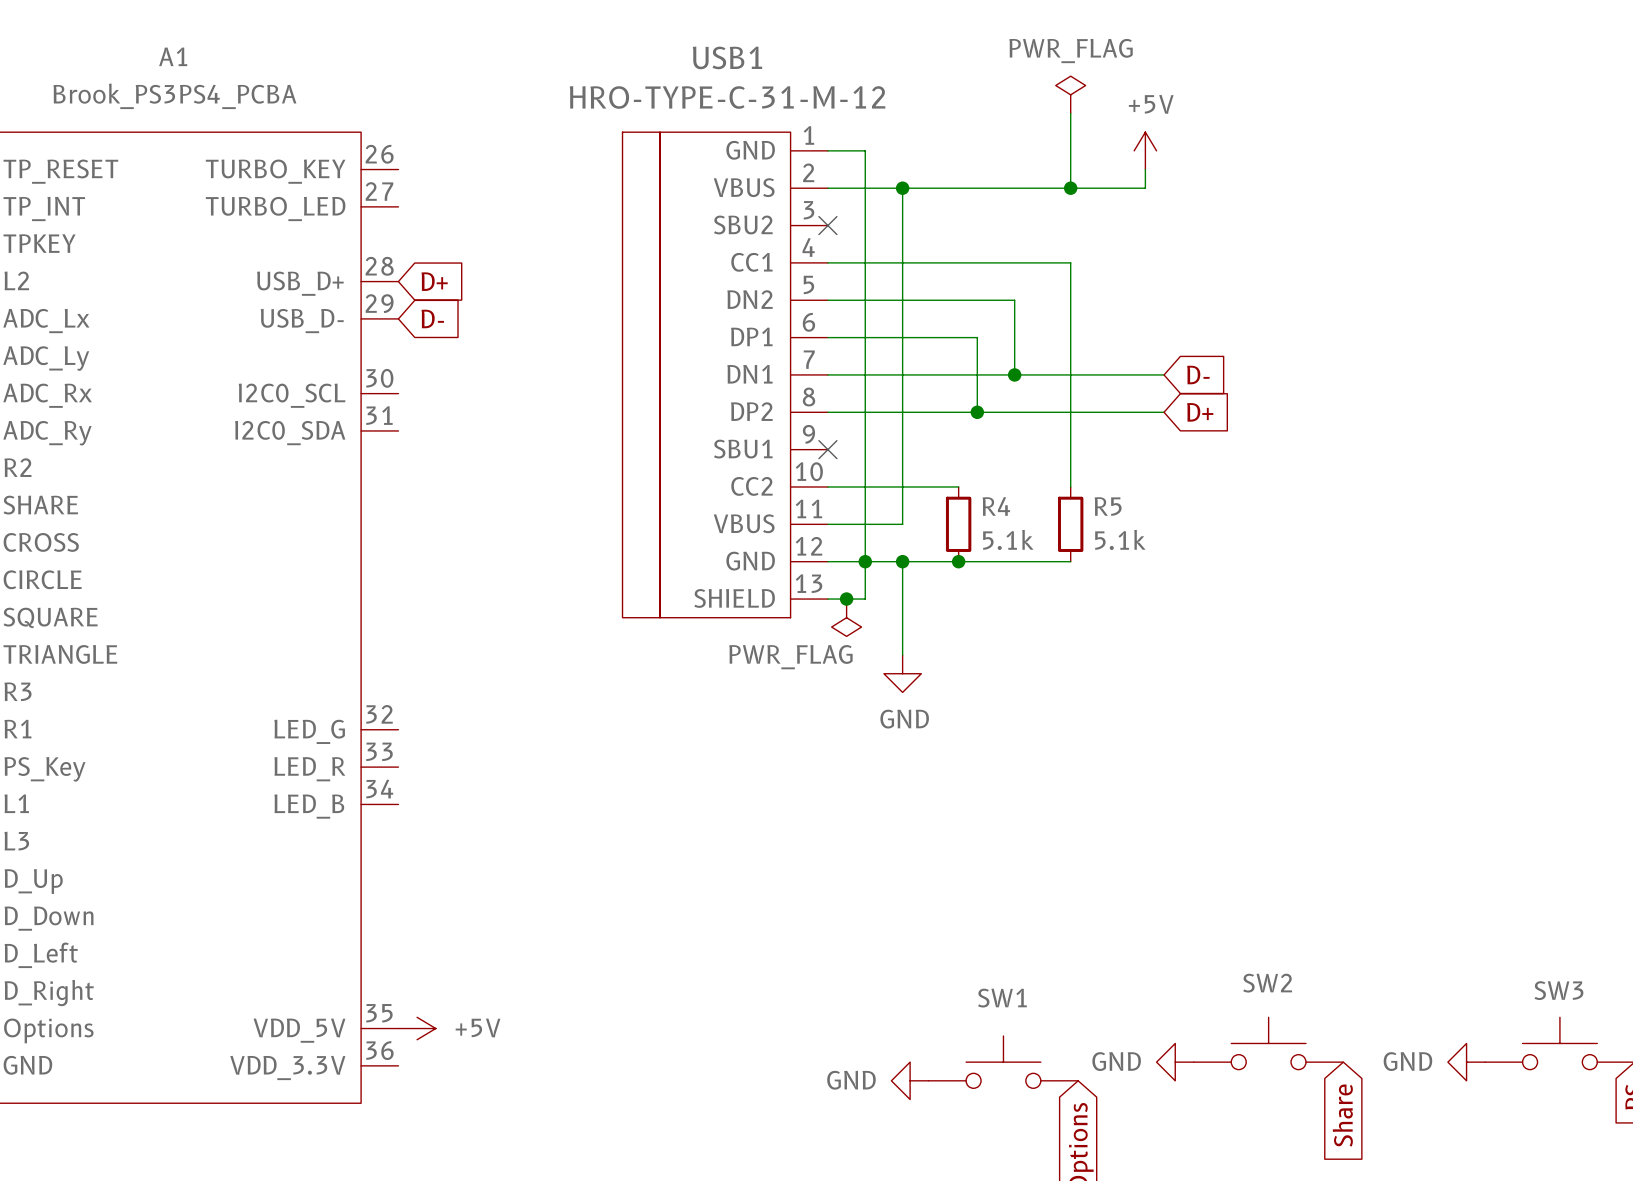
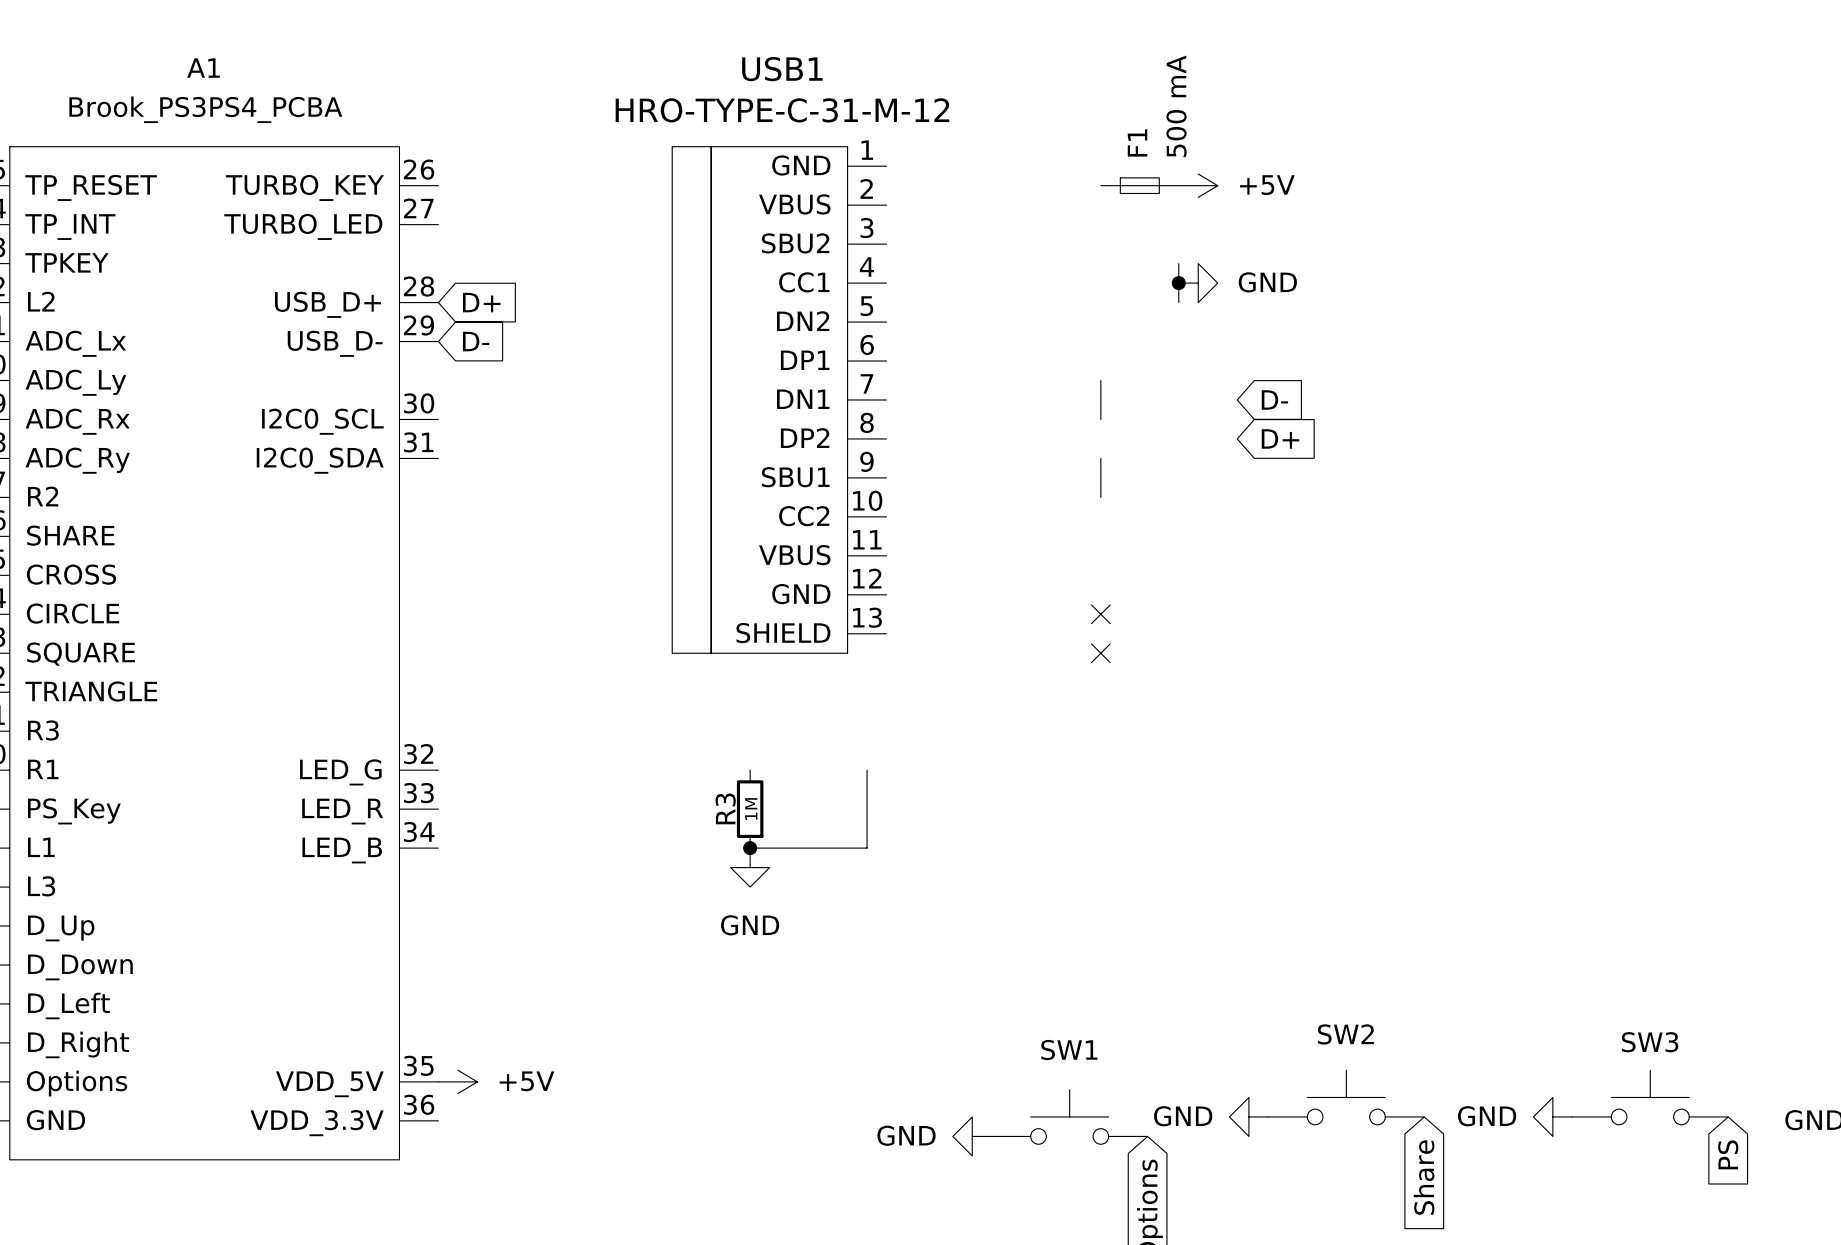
power symbol: PWR_FLAG (1070, 94) -> none
wire: (1070, 113) (1070, 188) -> none
wire: (827, 150) (865, 150) (865, 599) (827, 599) -> none
power symbol rotation: 0° (1145, 150) -> 90° clockwise (1198, 185)
power symbol position: +5V (1145, 150) -> +5V (1198, 185)
F1: none -> 500 mA (1139, 185)
wire: (1145, 169) (1145, 188) (827, 188) -> none
wire: (902, 188) (902, 524) (827, 524) -> none
junction: (902, 188) -> none
junction: (1070, 188) -> none
no-connect mark: (827, 225) -> none
wire: none -> (1178, 263) (1178, 302)
wire: (827, 262) (1070, 262) (1070, 486) -> none
junction: none -> (1178, 283)
power symbol: none -> GND (1198, 283)
wire: (827, 300) (1014, 300) (1014, 374) -> none
wire: (827, 337) (977, 337) (977, 412) -> none
wire: none -> (1100, 380) (1100, 419)
wire: (827, 374) (1164, 374) -> none
junction: (1014, 374) -> none
wire: (827, 412) (1164, 412) -> none
junction: (977, 412) -> none
wire: none -> (1100, 458) (1100, 497)
no-connect mark: (827, 449) -> none
wire: (827, 486) (958, 486) -> none
R4: 5.1k (958, 524) -> none
R5: 5.1k (1070, 524) -> none
wire: (827, 561) (1070, 561) -> none
junction: (865, 561) -> none
wire: (902, 561) (902, 655) -> none
junction: (902, 561) -> none
junction: (958, 561) -> none
no-connect mark: none -> (1100, 614)
junction: (846, 599) -> none
power symbol: PWR_FLAG (846, 617) -> none
no-connect mark: none -> (1100, 653)
power symbol: GND (902, 673) -> none
wire: none -> (867, 770) (867, 848) (750, 848)
R3: none -> 1M (750, 809)
junction: none -> (750, 848)
power symbol: none -> GND (750, 867)

